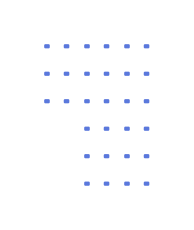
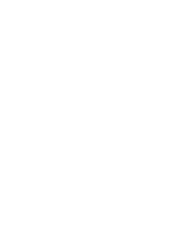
part: (56, 46) -> none
part: (96, 46) -> none
part: (136, 46) -> none
part: (56, 73) -> none
part: (96, 73) -> none
part: (136, 73) -> none
part: (56, 101) -> none
part: (96, 101) -> none
part: (136, 101) -> none
part: (96, 128) -> none
part: (136, 128) -> none
part: (96, 156) -> none
part: (136, 156) -> none
part: (96, 183) -> none
part: (136, 183) -> none

